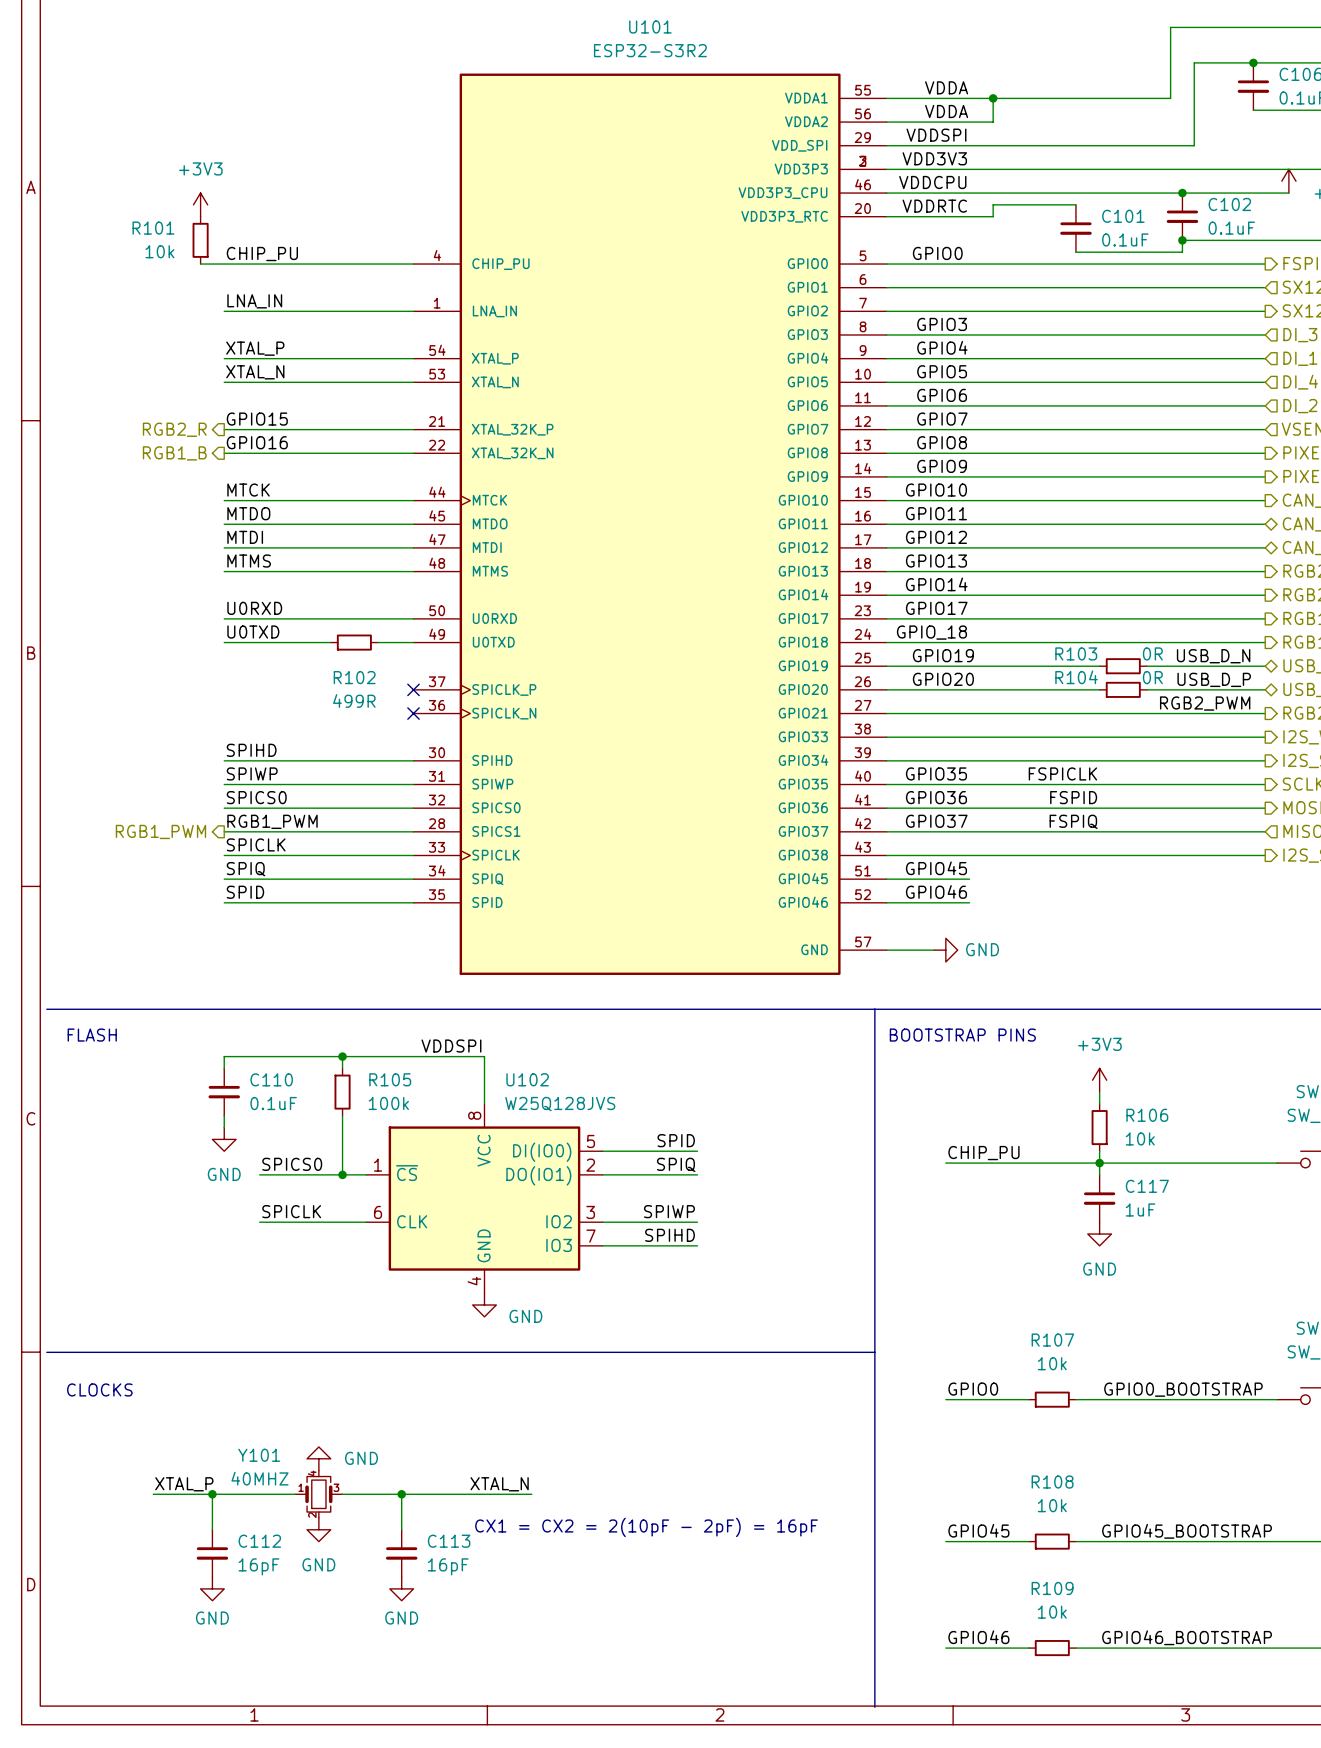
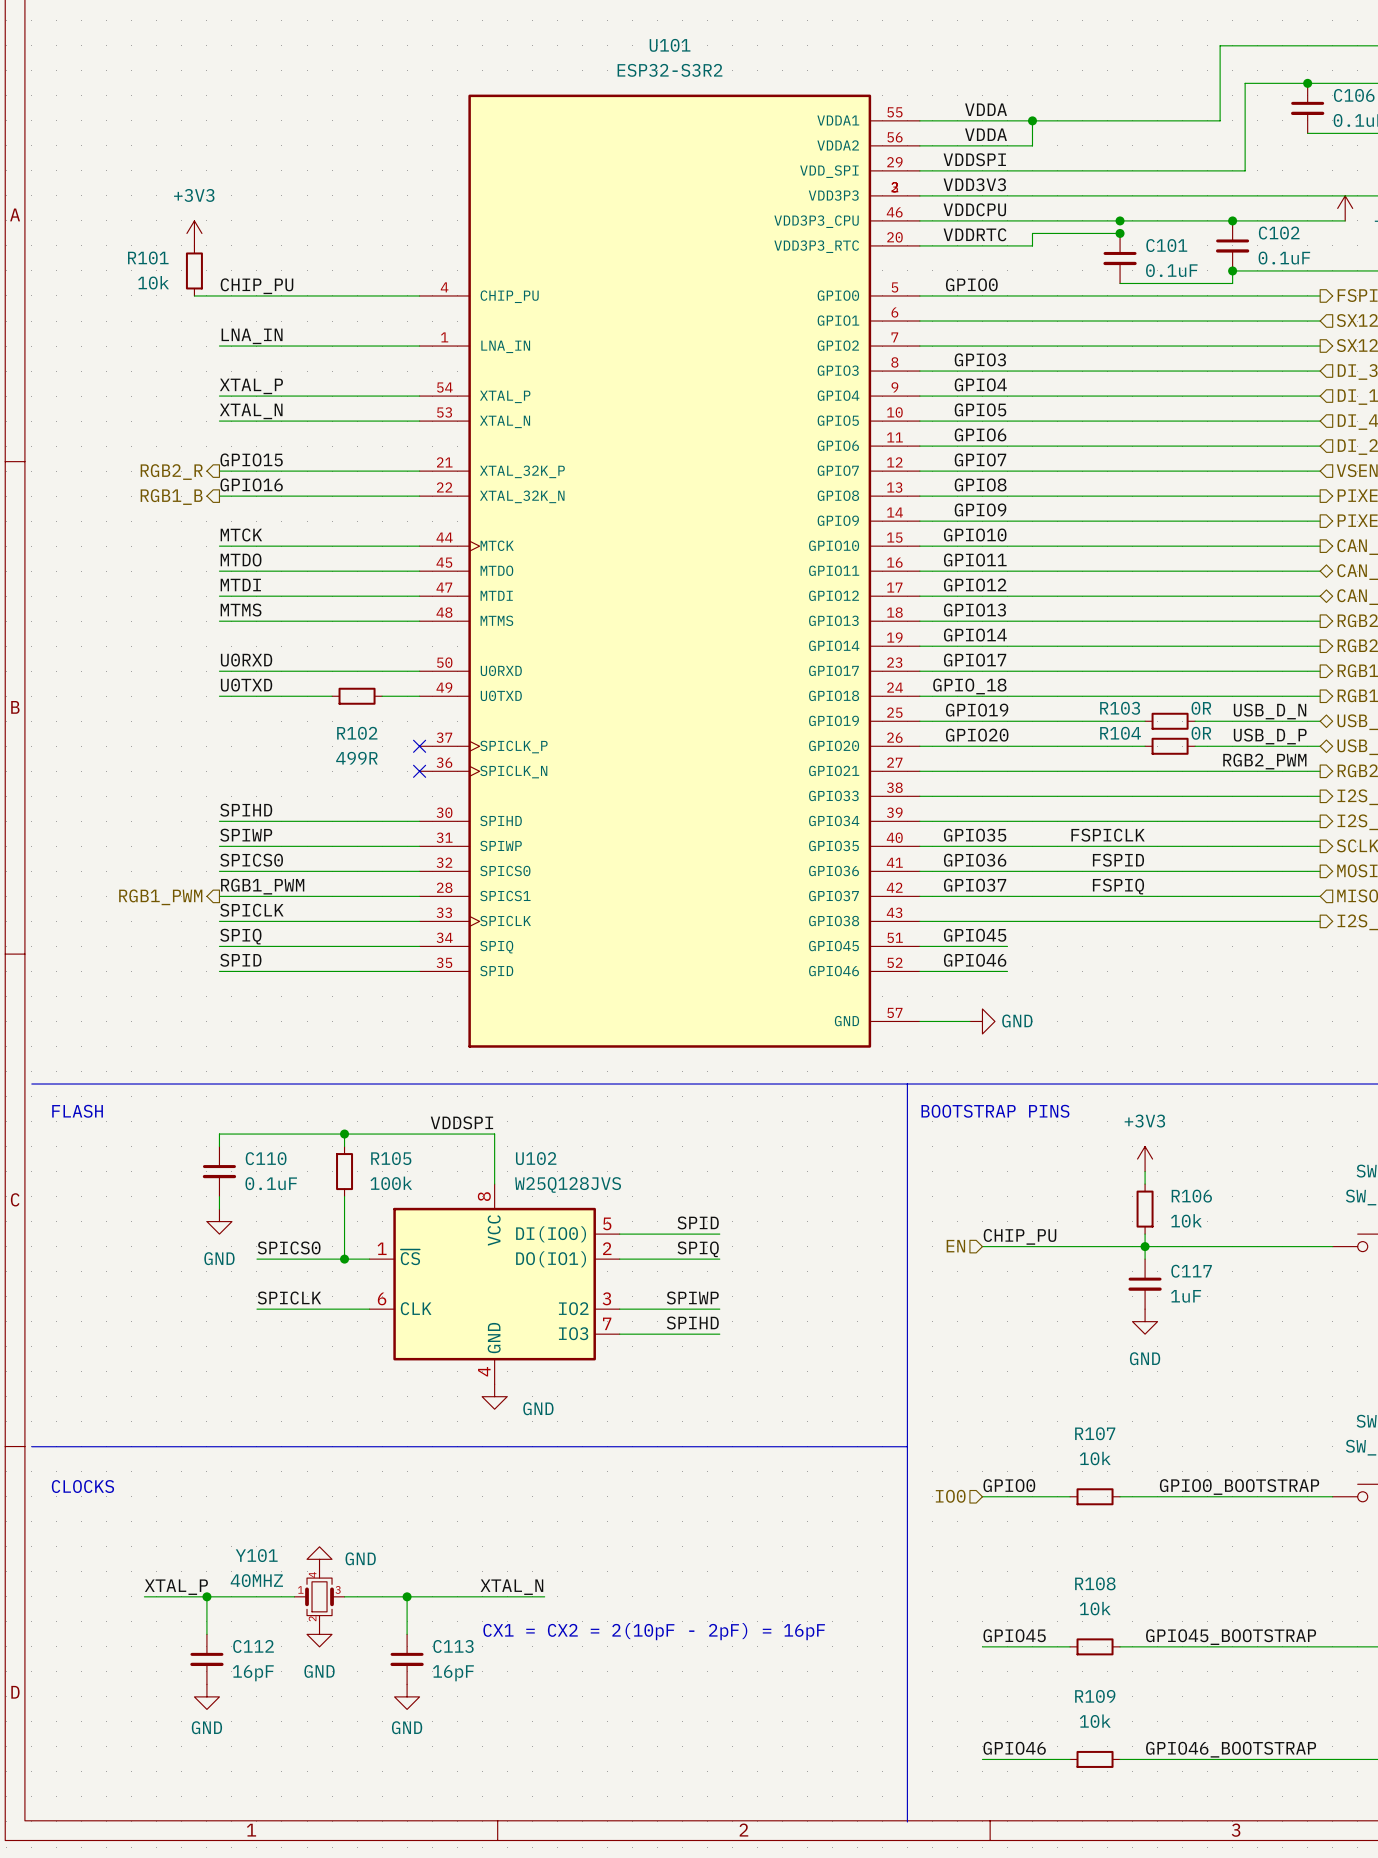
junction: none -> (1120, 220)
junction: none -> (1120, 233)
hierarchical label: none -> EN (955, 1246)
hierarchical label: none -> IO0 (950, 1496)

